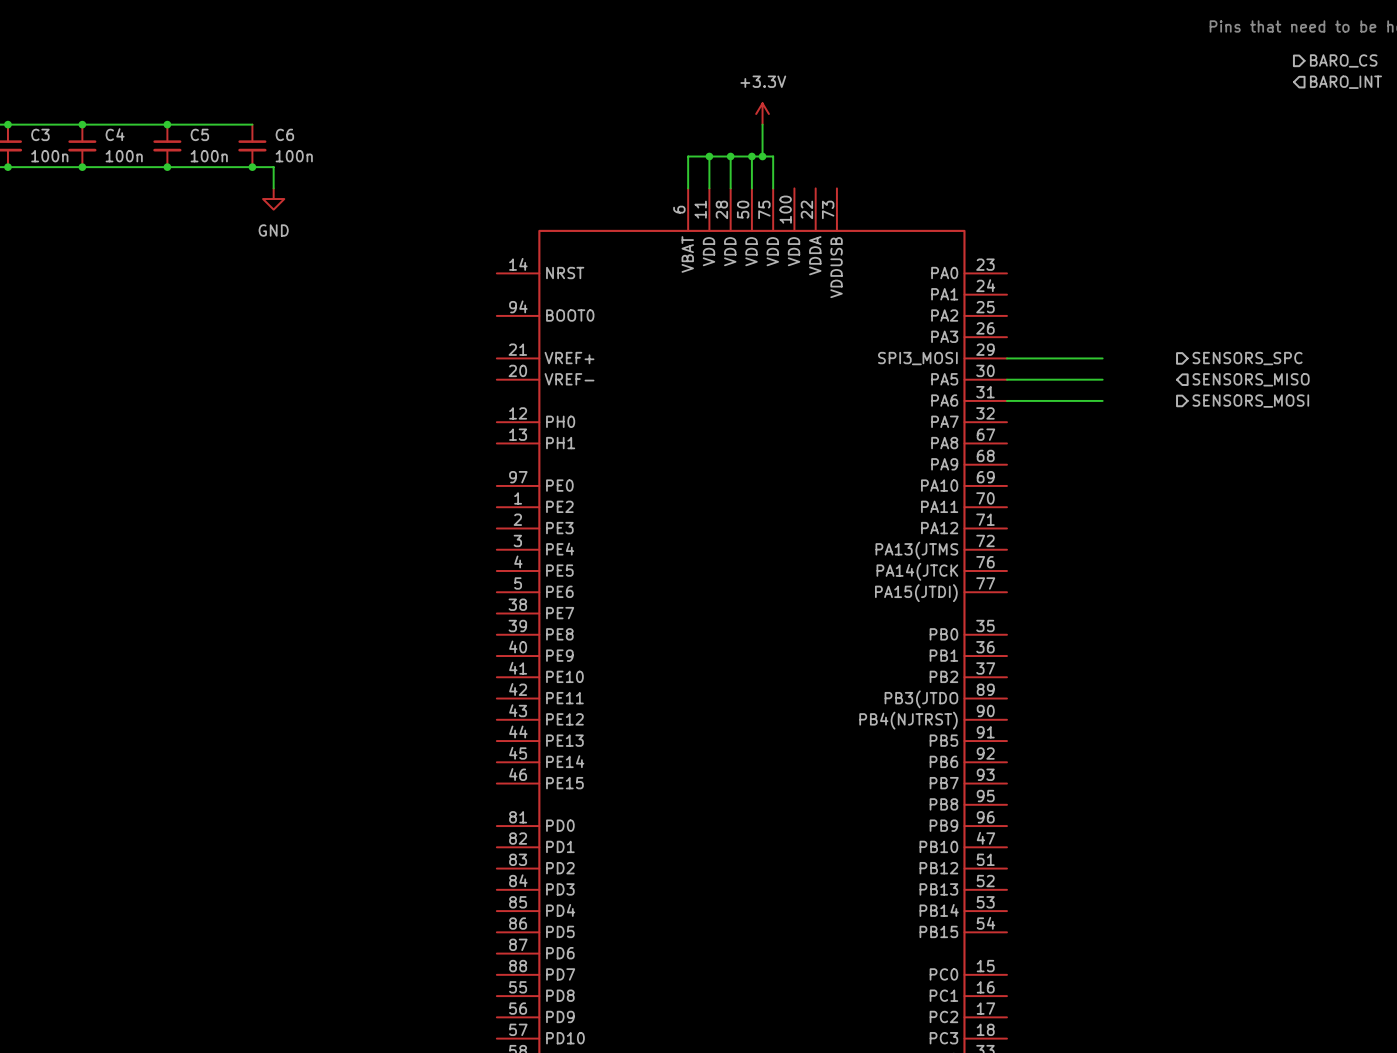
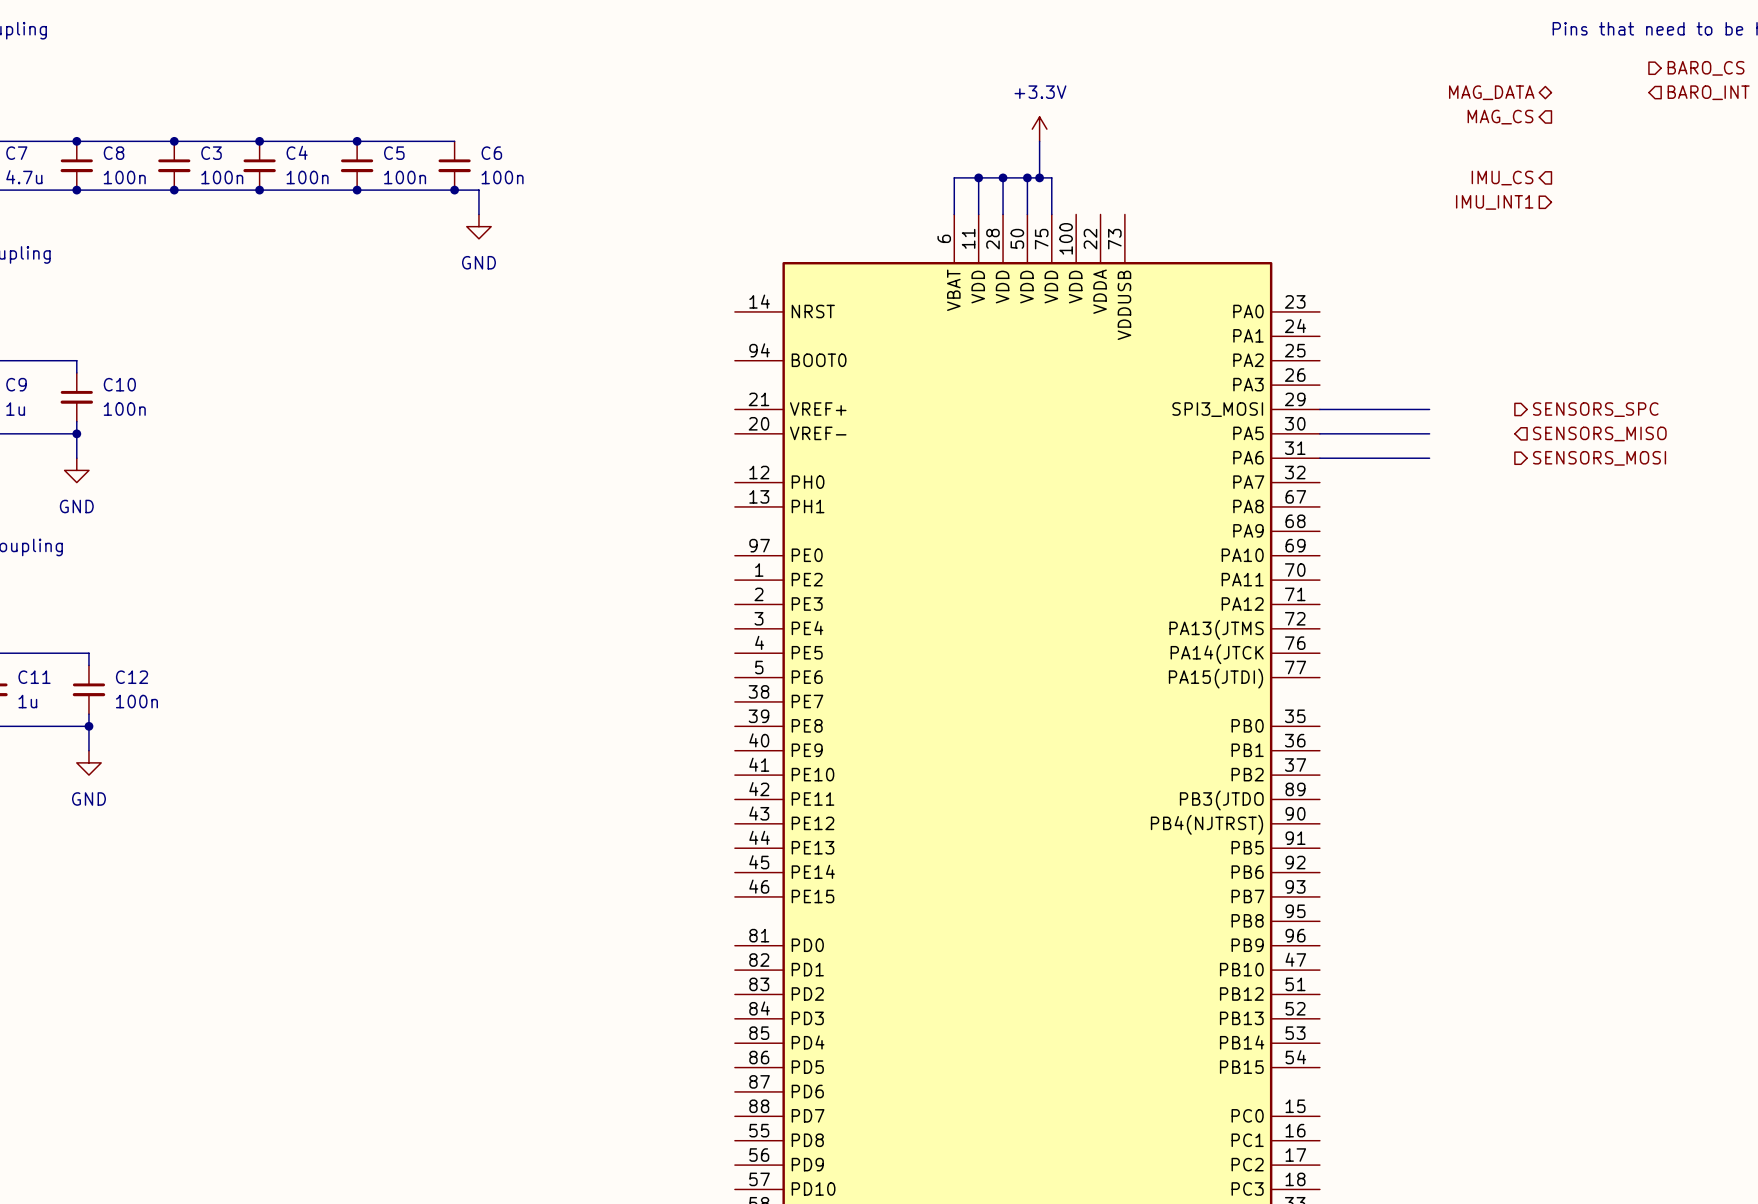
hierarchical label: none -> MAG_DATA (1491, 92)
hierarchical label: none -> MAG_CS (1500, 117)
hierarchical label: none -> IMU_CS (1502, 178)
hierarchical label: none -> IMU_INT1 (1494, 202)

